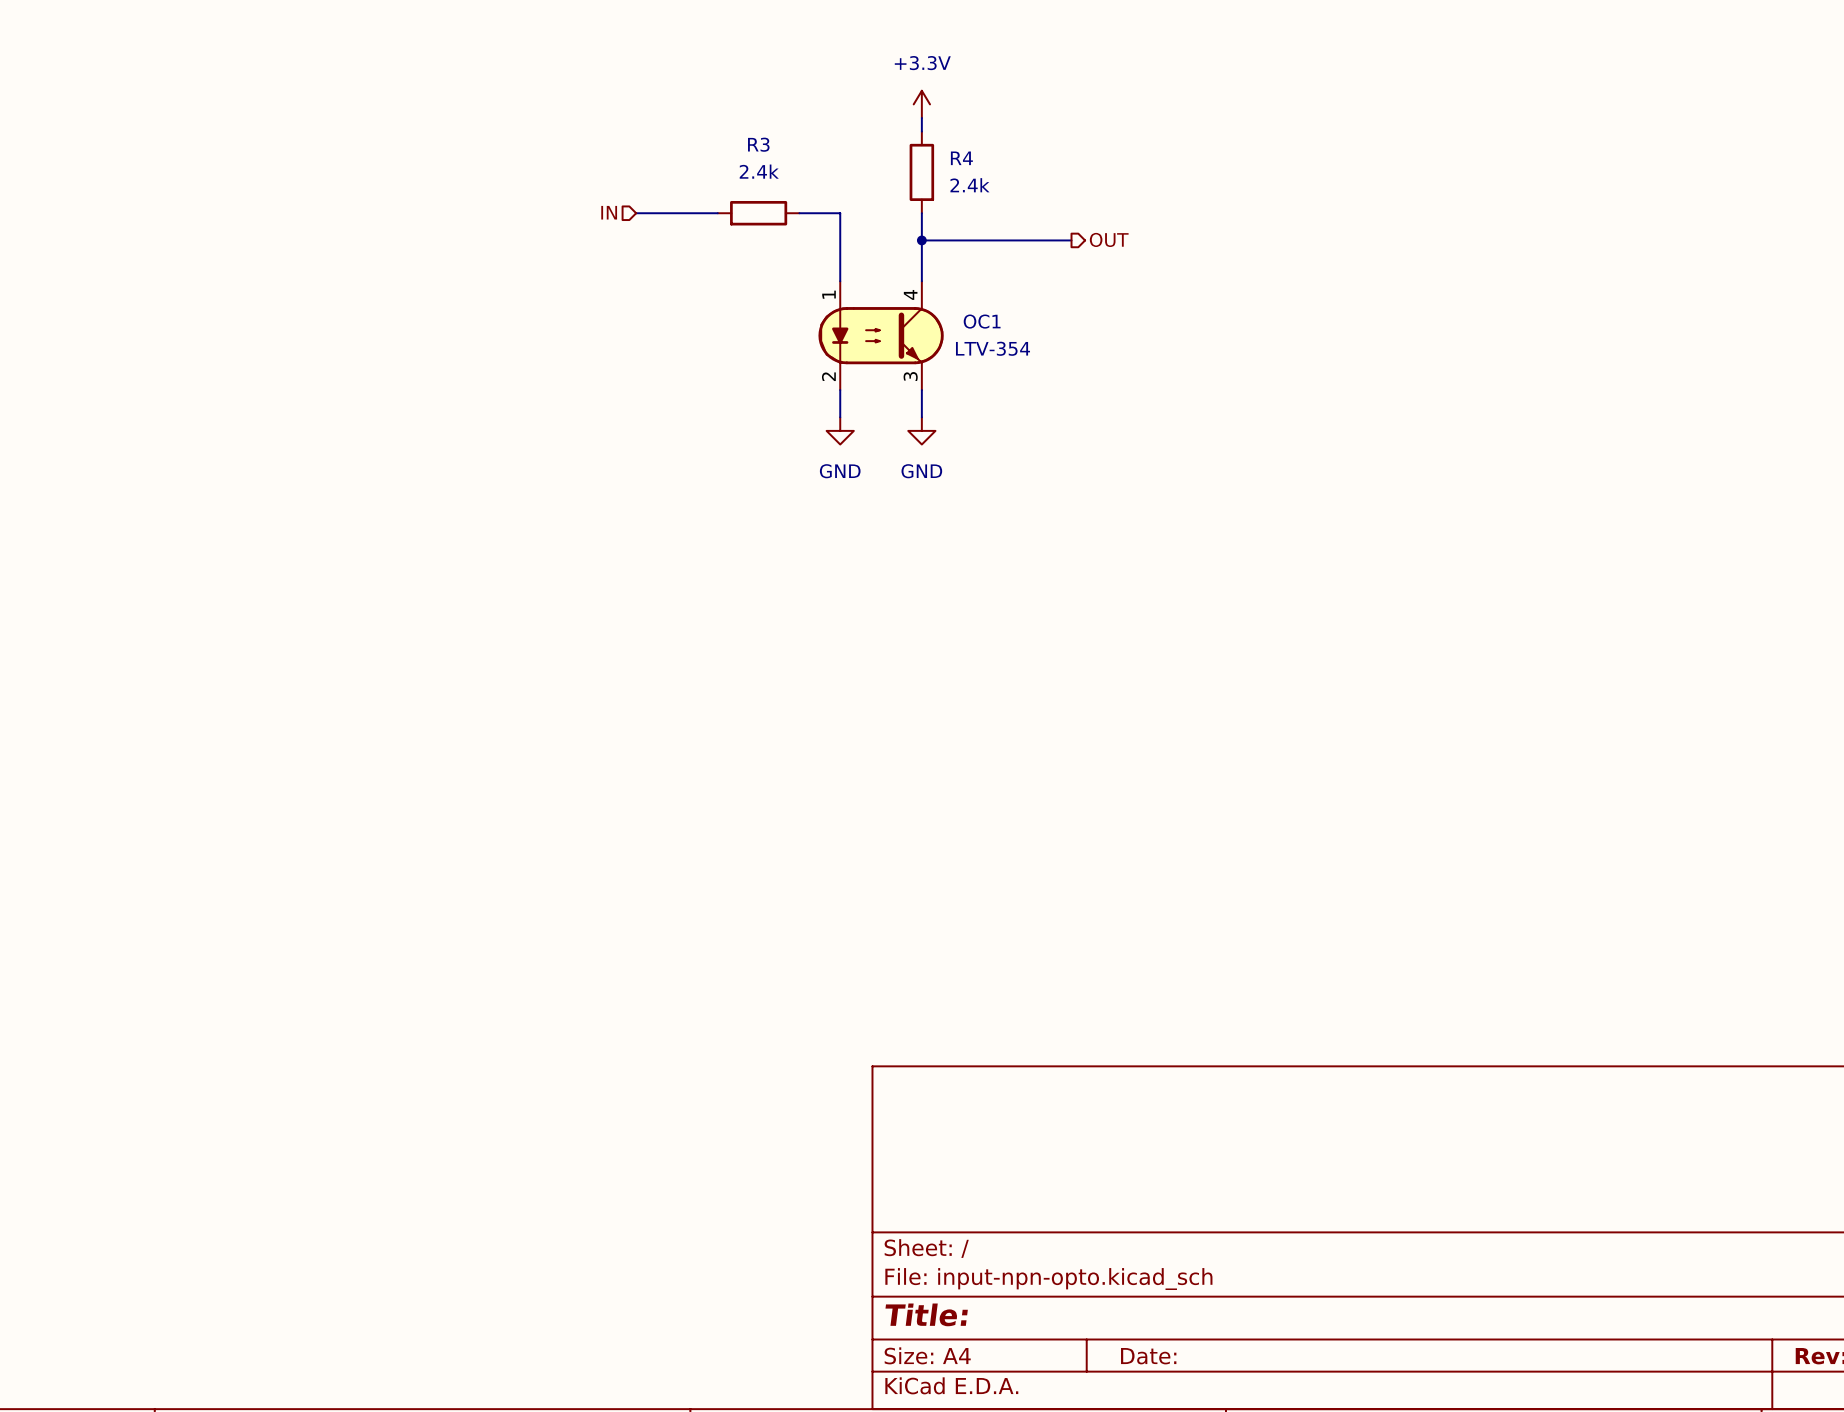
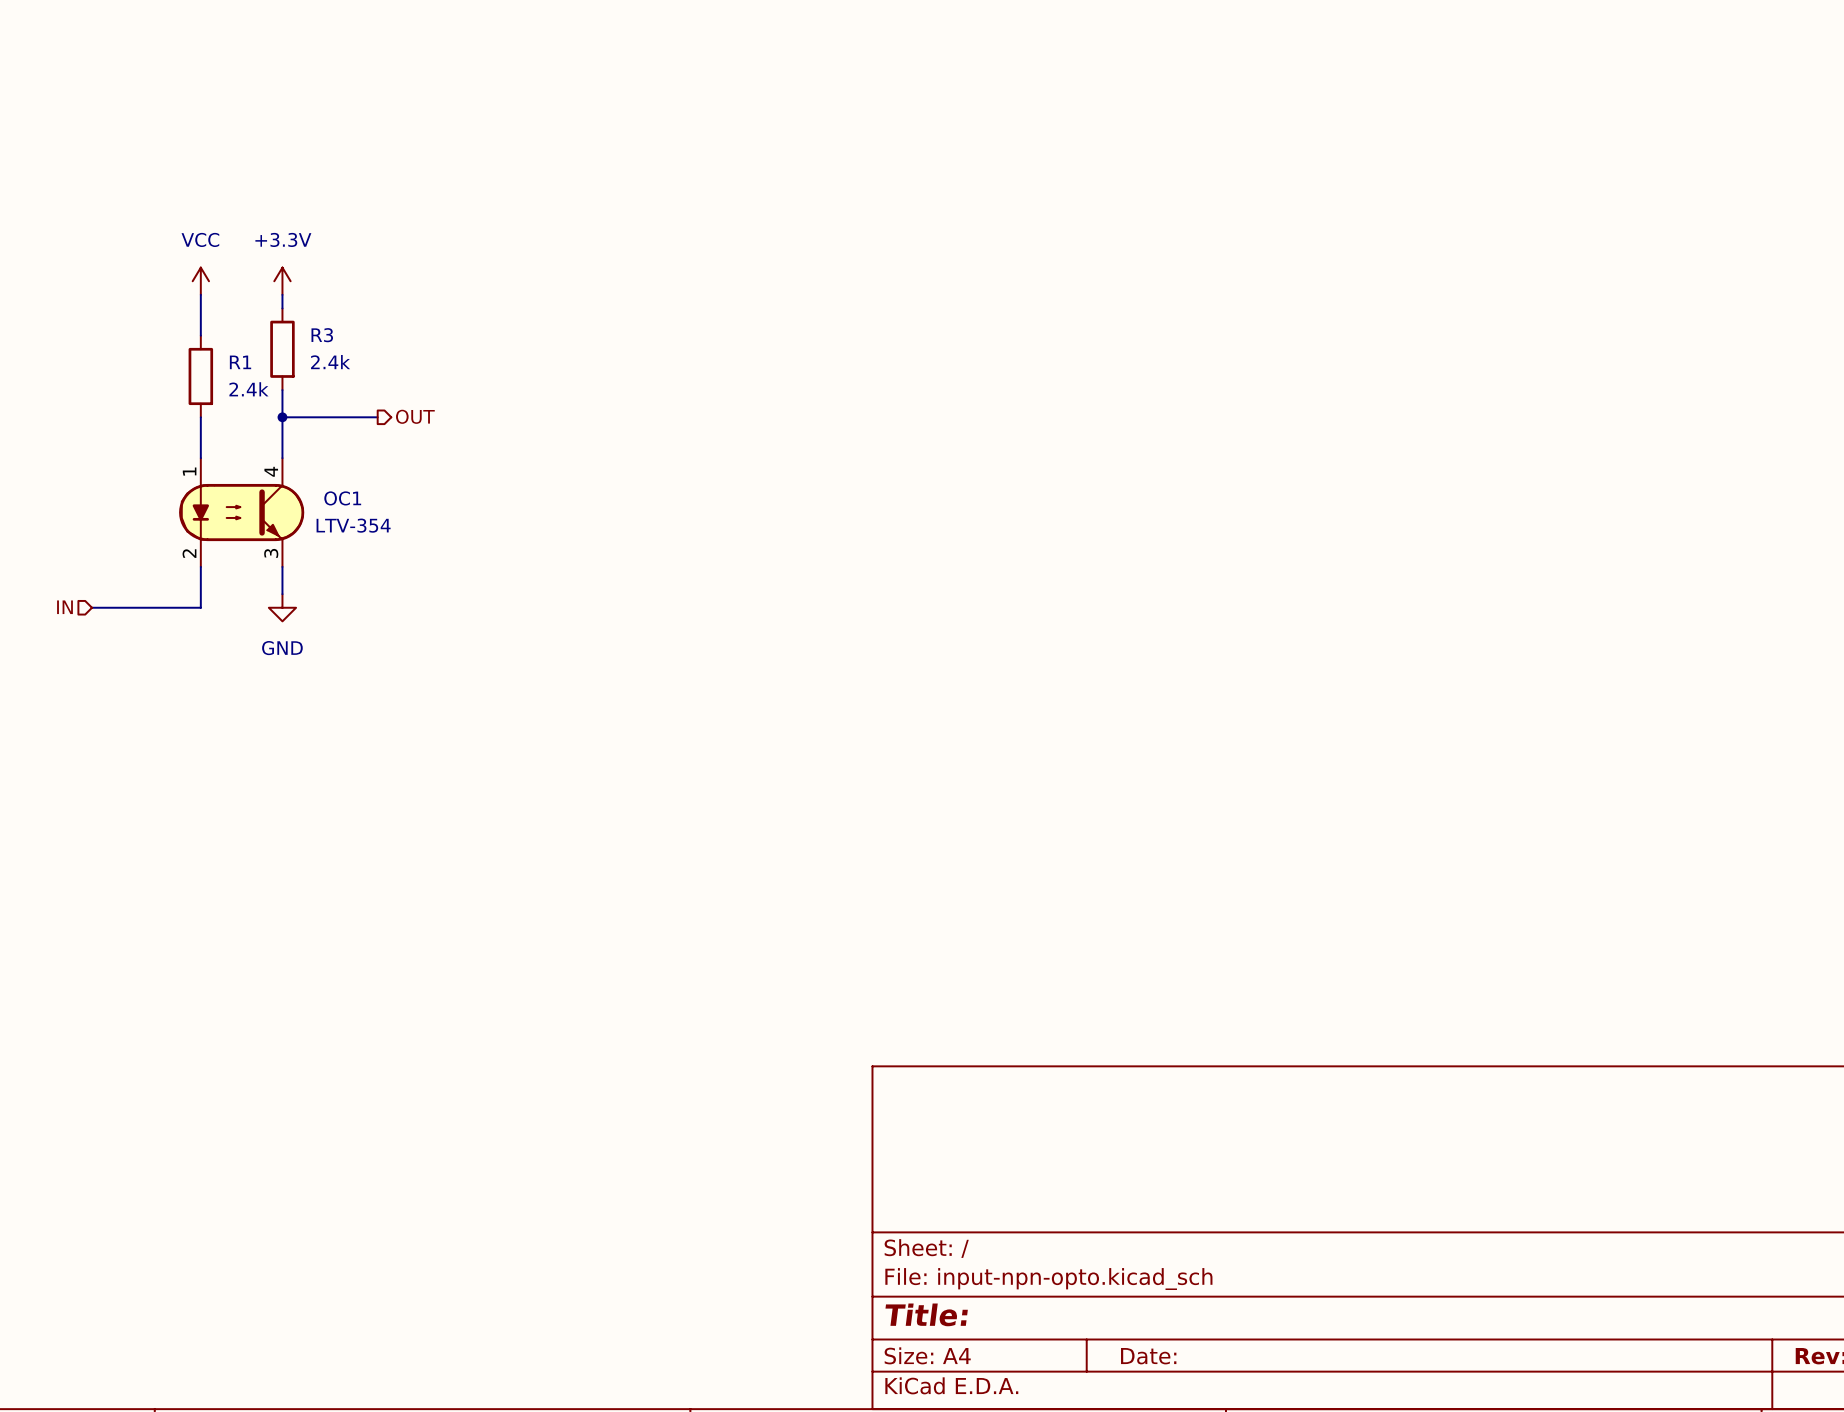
power symbol: +3.3V (921, 104) -> none
wire: (921, 118) (921, 131) -> none
R3 name position: R3 (758, 144) -> R3 (322, 335)
R4: 2.4k (921, 172) -> none
hierarchical label: IN (609, 212) -> none
wire: (636, 213) (717, 213) -> none
R3 rotation: 0° (758, 213) -> 90° clockwise (282, 349)
R3 position: (758, 213) -> (282, 349)
wire: (799, 213) (840, 213) (840, 281) -> none
wire: (921, 213) (921, 281) -> none
hierarchical label: OUT (1109, 239) -> none
wire: (921, 240) (1071, 240) -> none
junction: (921, 240) -> none
power symbol: none -> VCC (200, 281)
power symbol: none -> +3.3V (282, 281)
wire: none -> (200, 294) (200, 335)
wire: none -> (282, 294) (282, 308)
OC1 position: (881, 335) -> (241, 512)
R1: none -> 2.4k (200, 376)
wire: none -> (282, 390) (282, 458)
wire: (840, 390) (840, 417) -> none
wire: (921, 390) (921, 417) -> none
hierarchical label: none -> OUT (415, 416)
wire: none -> (200, 417) (200, 458)
wire: none -> (282, 417) (377, 417)
junction: none -> (282, 417)
power symbol: GND (840, 430) -> none
power symbol: GND (921, 430) -> none
wire: none -> (200, 566) (200, 607) (92, 607)
wire: none -> (282, 566) (282, 594)
hierarchical label: none -> IN (64, 607)
power symbol: none -> GND (282, 607)

